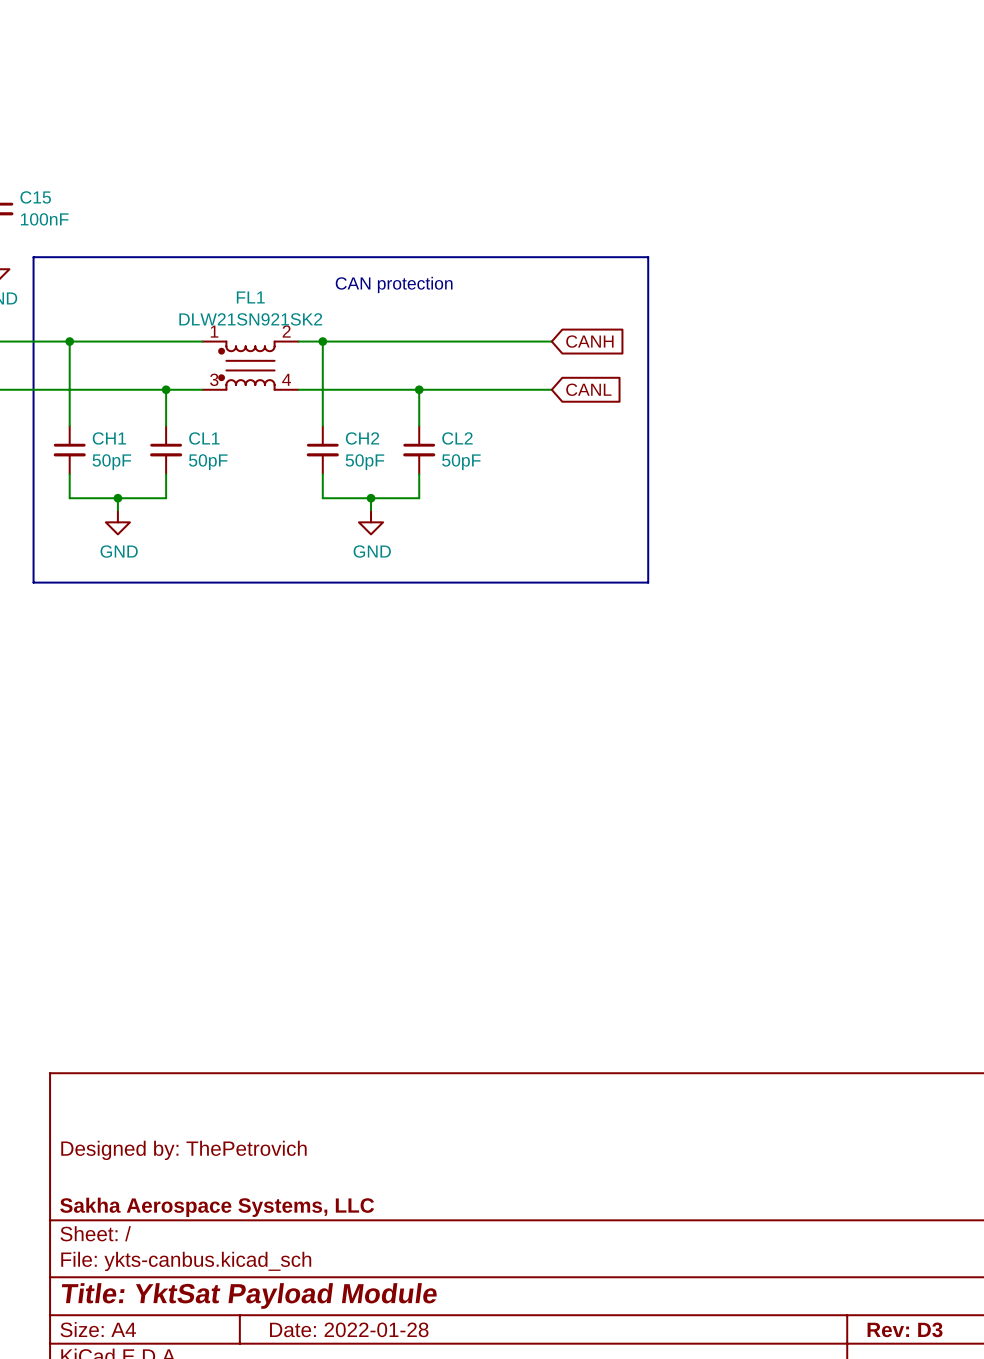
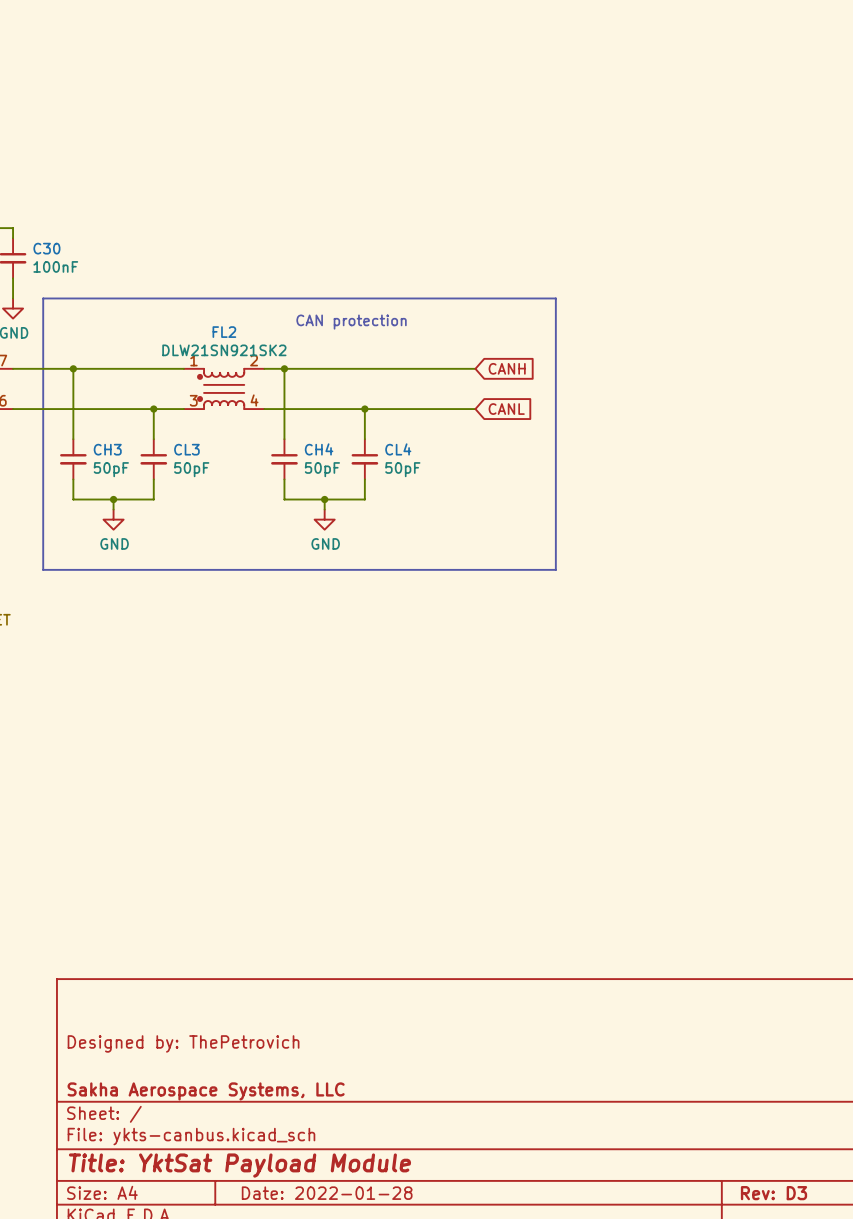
C15 name: C15 (35, 197) -> C30 (46, 248)
FL1 name: FL1 (250, 297) -> FL2 (224, 332)
CH1 name: CH1 (109, 438) -> CH3 (107, 449)
CL1 name: CL1 (204, 438) -> CL3 (186, 449)
CH2 name: CH2 (362, 438) -> CH4 (319, 449)
CL2 name: CL2 (457, 438) -> CL4 (398, 449)

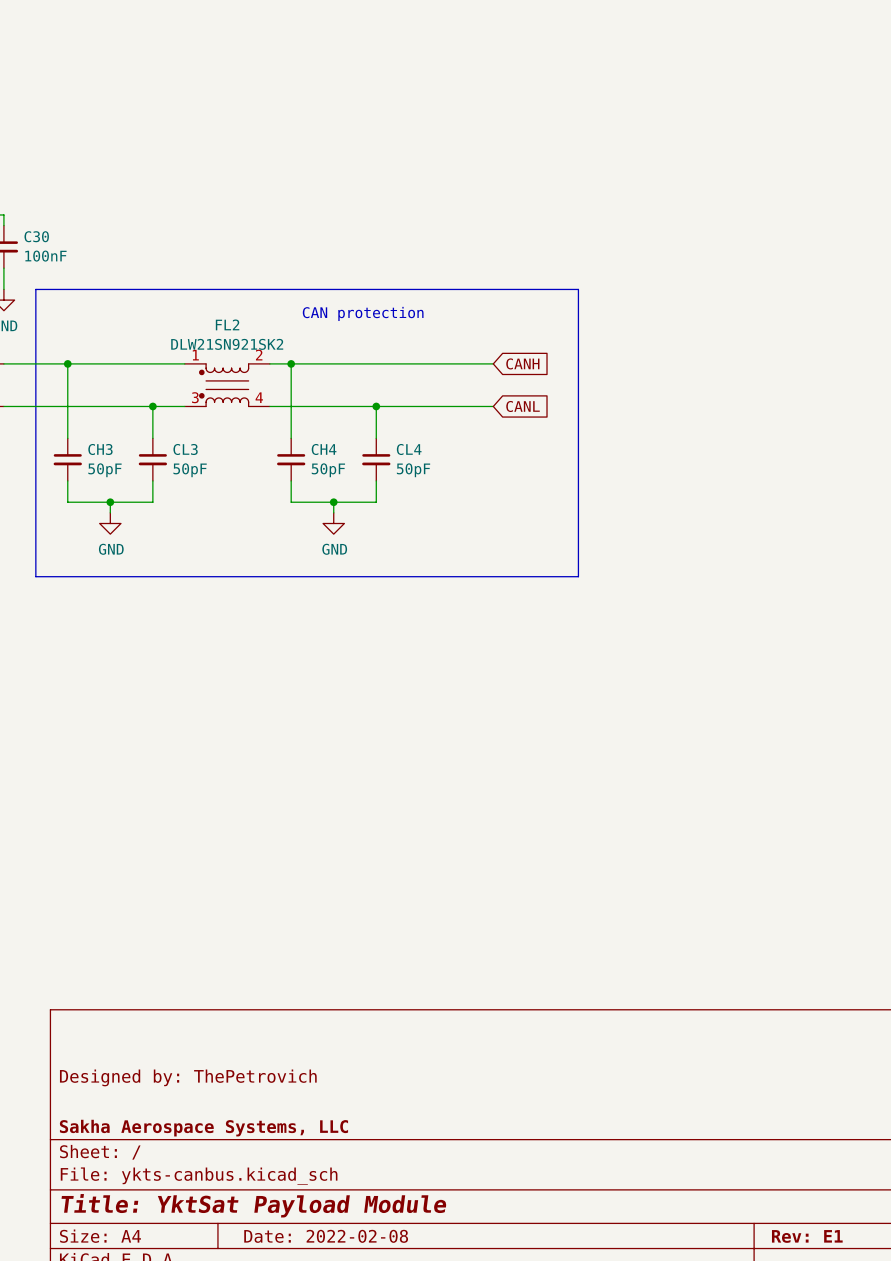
title block: Date: 2022-01-28 (327, 1193) -> Date: 2022-02-08 (326, 1236)
title block: Rev: D3 (774, 1193) -> Rev: E1 (807, 1236)

